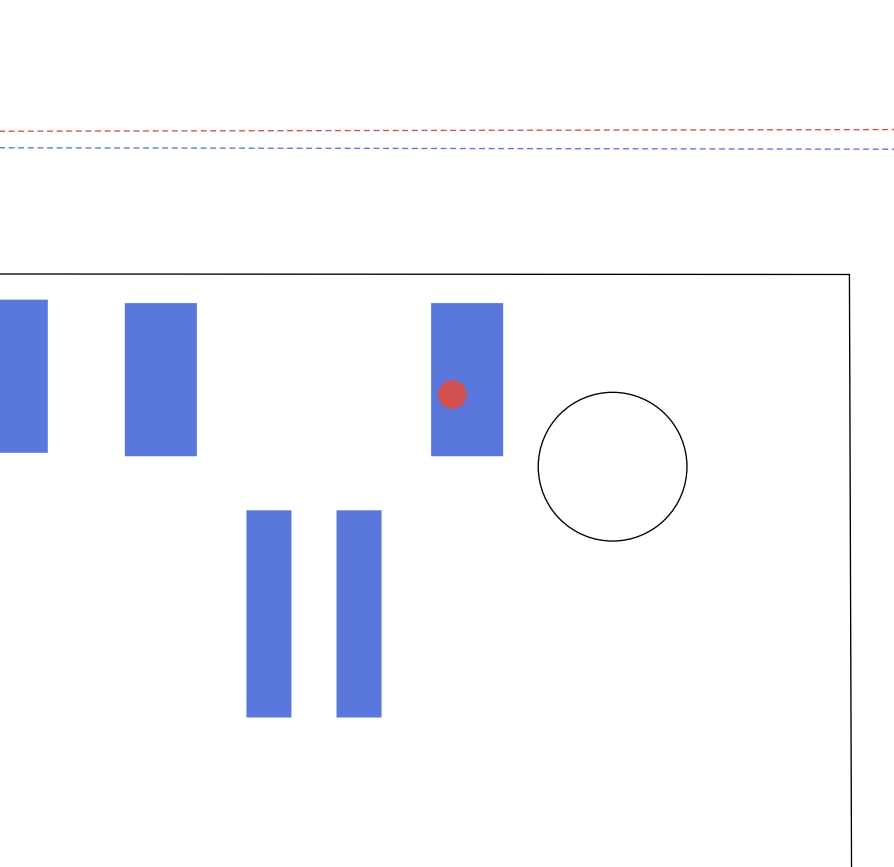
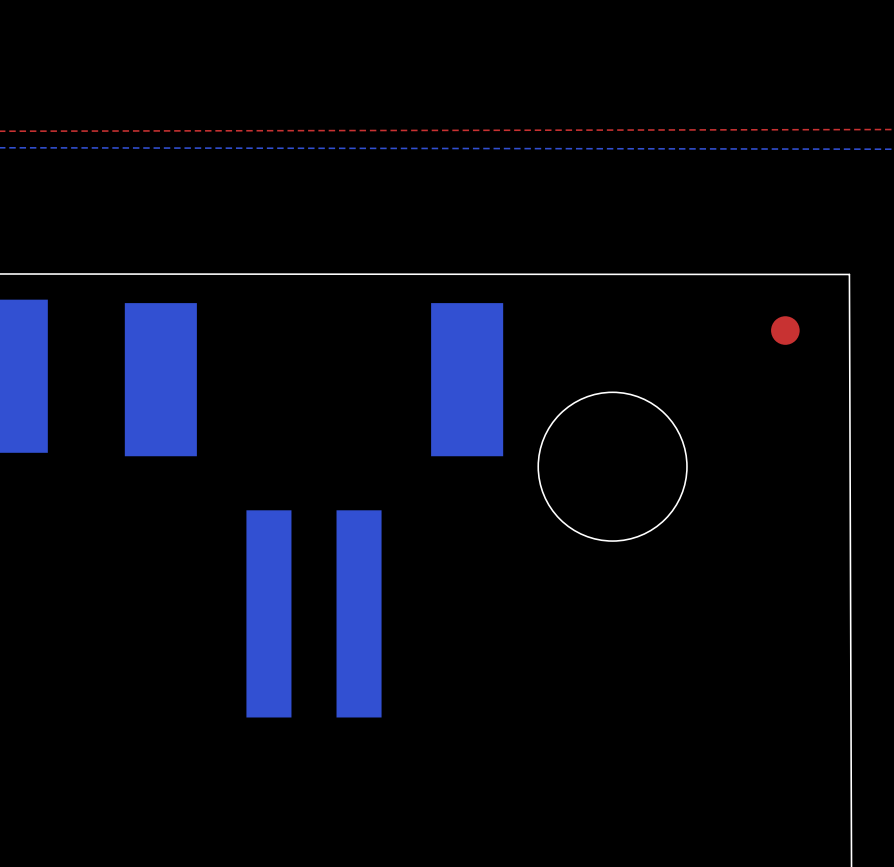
part position: (452, 394) -> (785, 330)

